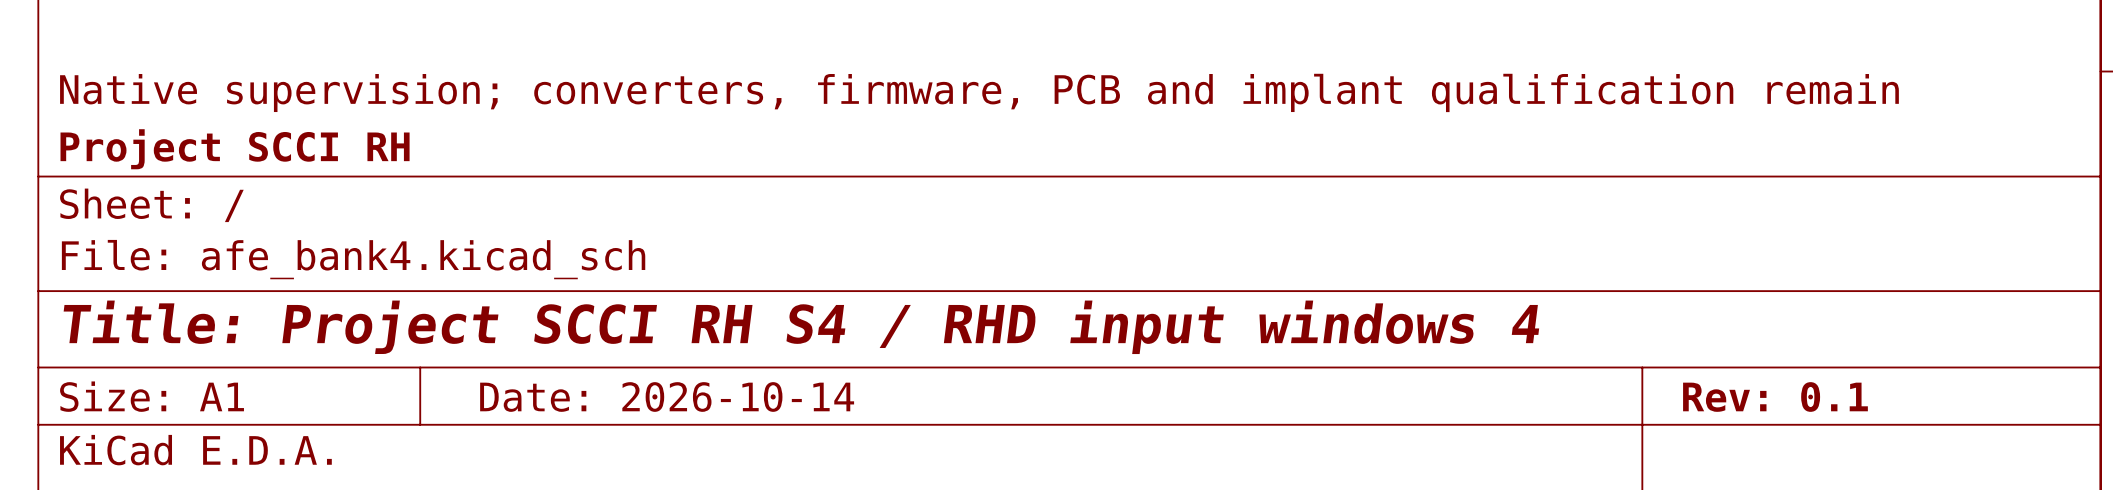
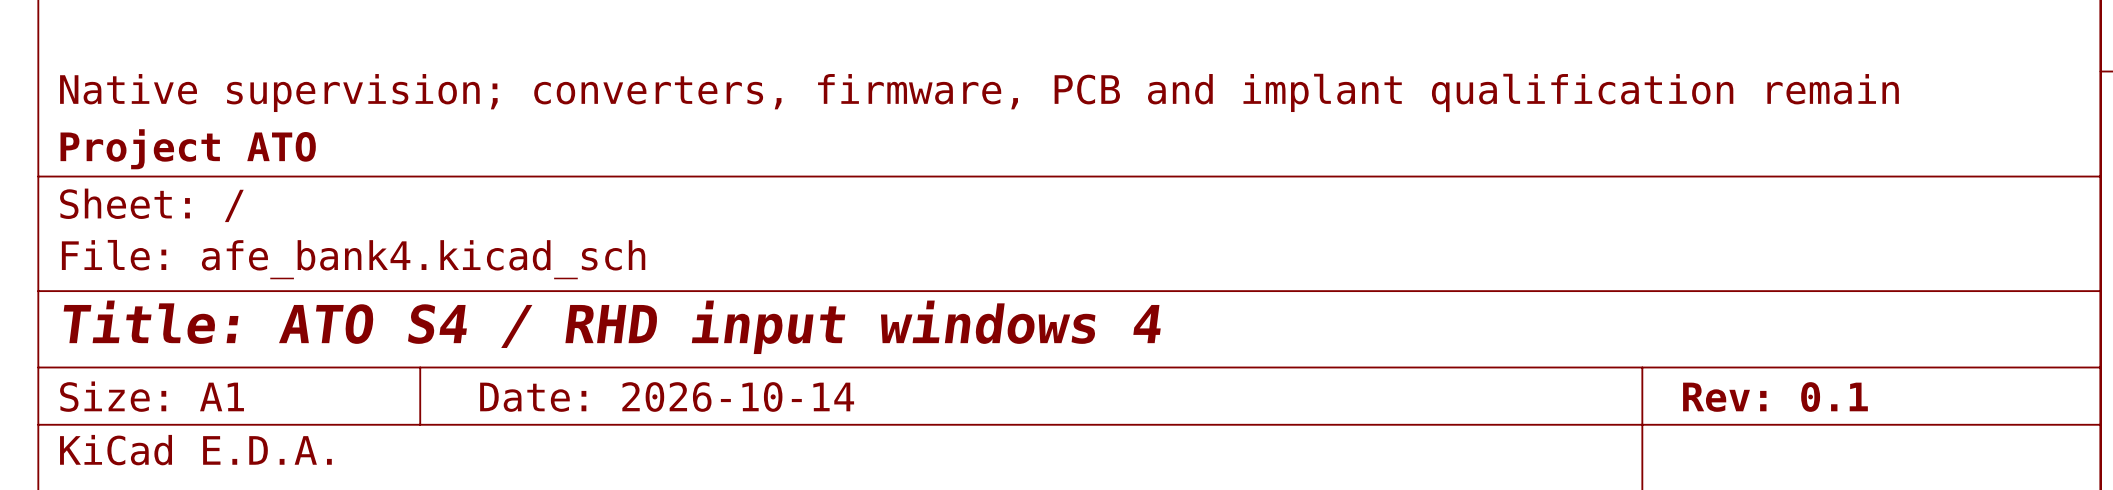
title block: Project SCCI RH (235, 149) -> Project ATO (188, 149)
title block: Title: Project SCCI RH S4 / RHD input windows 4 (801, 327) -> Title: ATO S4 / RHD input windows 4 (612, 327)

